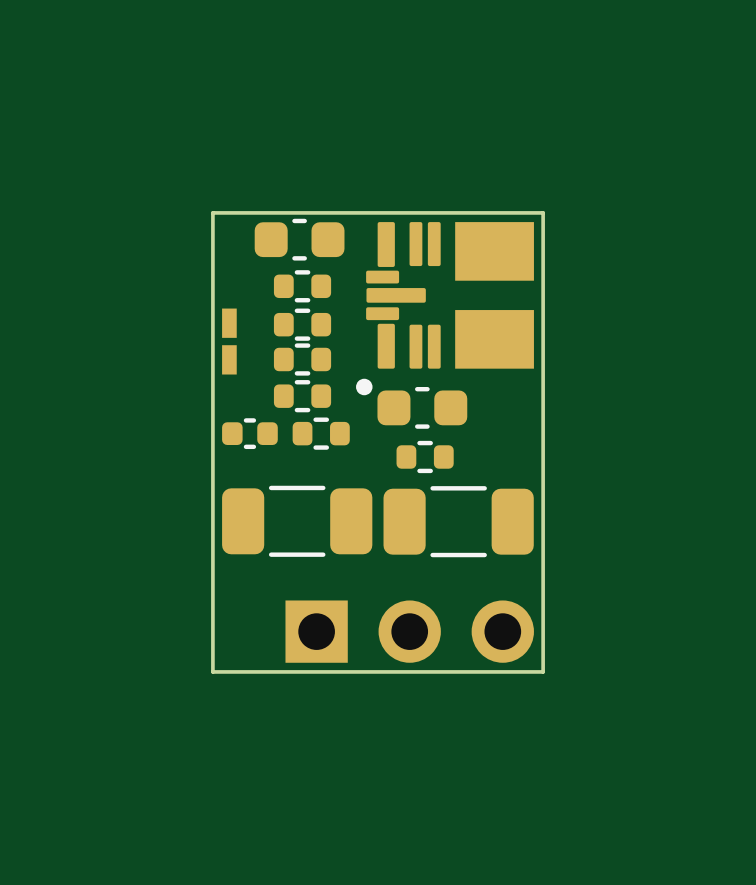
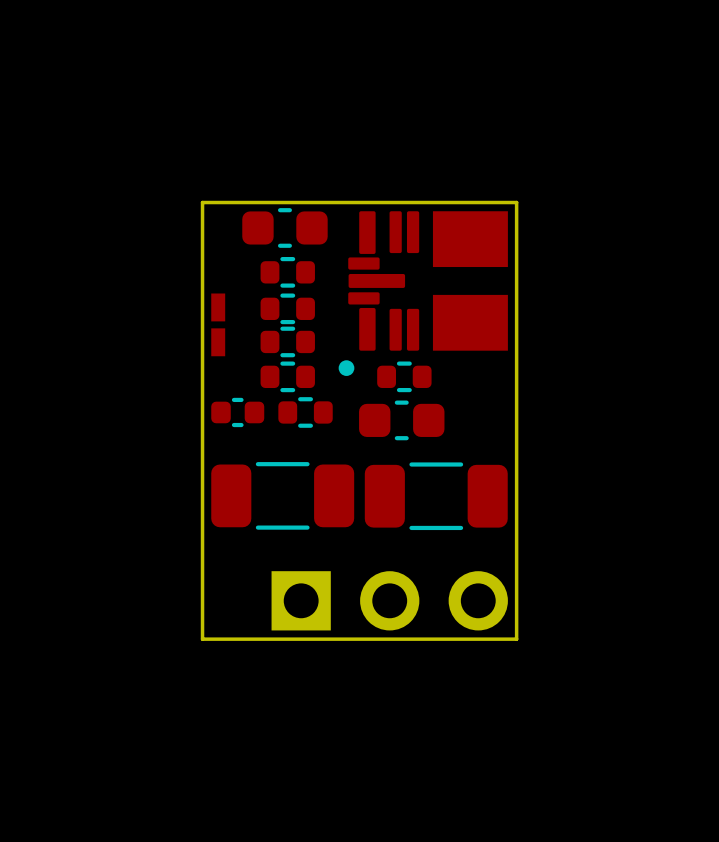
part footprint: [377, 386, 468, 429] -> [377, 361, 432, 393]
part footprint: [396, 440, 454, 474] -> [359, 400, 445, 441]

